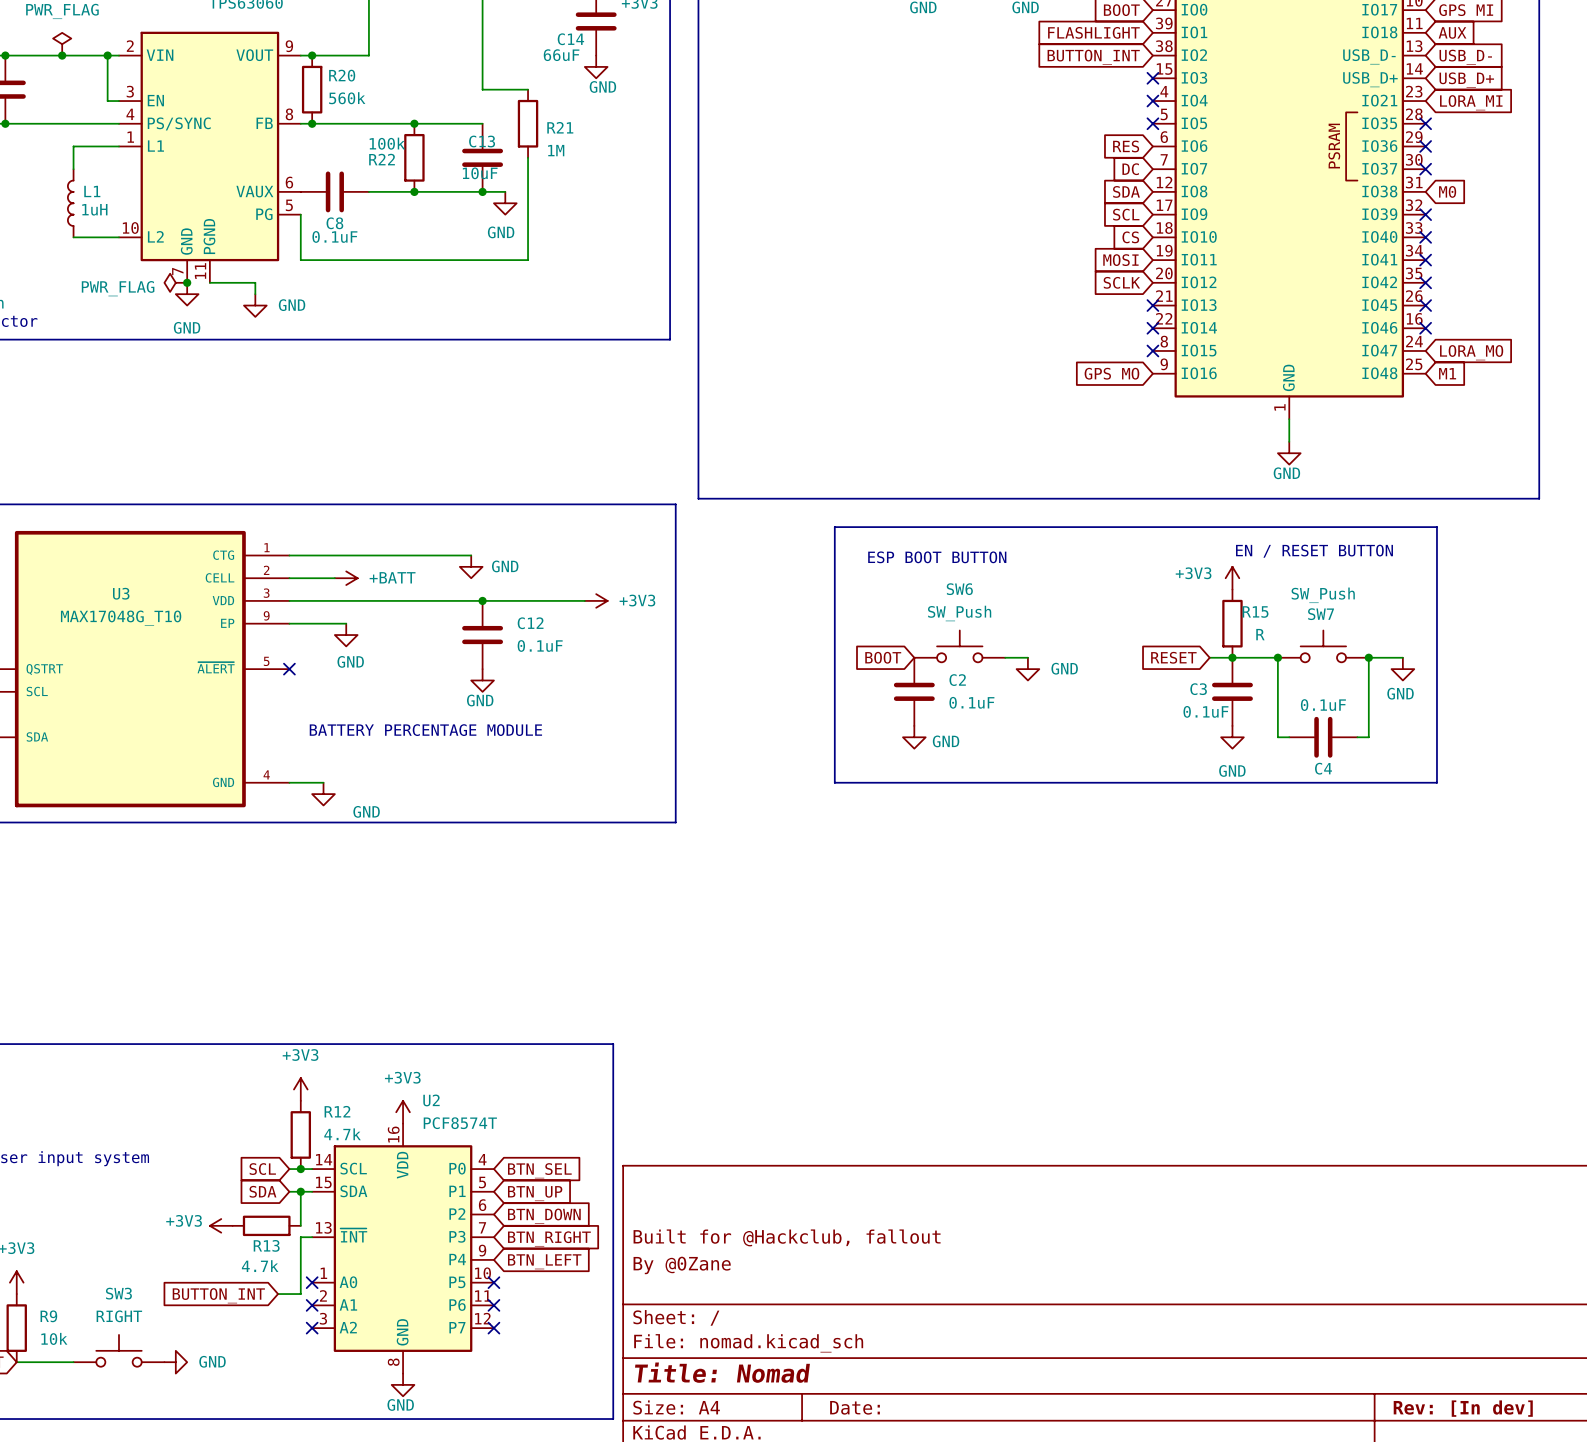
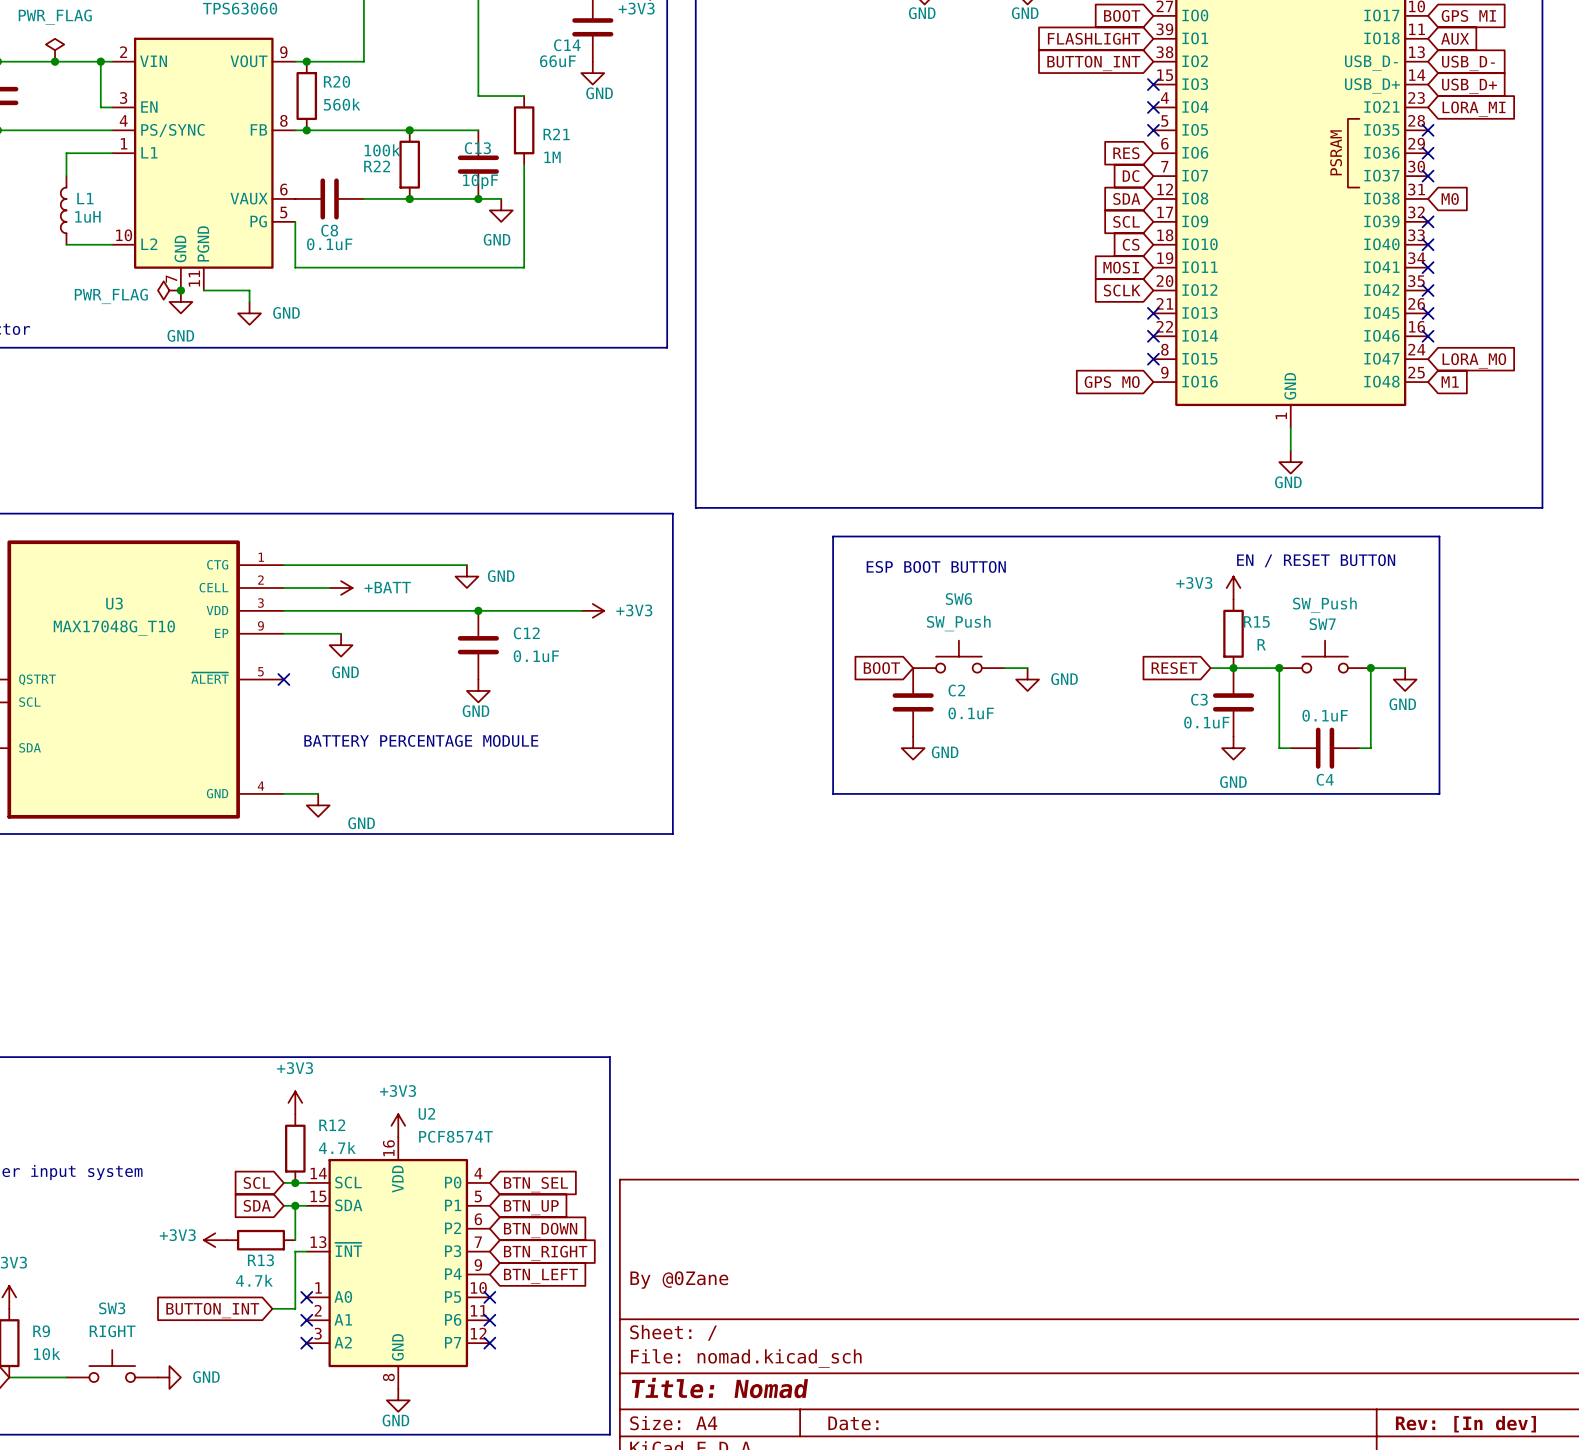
C13 value: 10uF (480, 173) -> 10pF (480, 181)
title block: Built for @Hackclub, fallout (787, 1237) -> none

